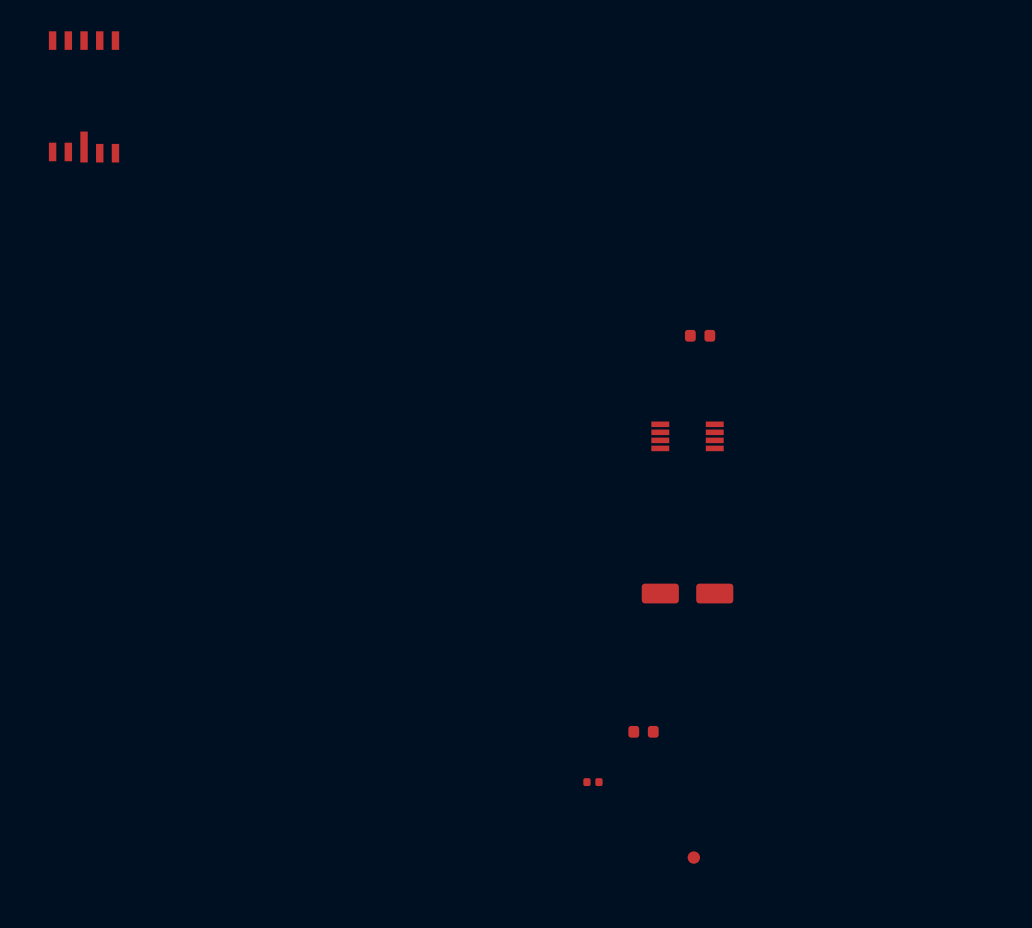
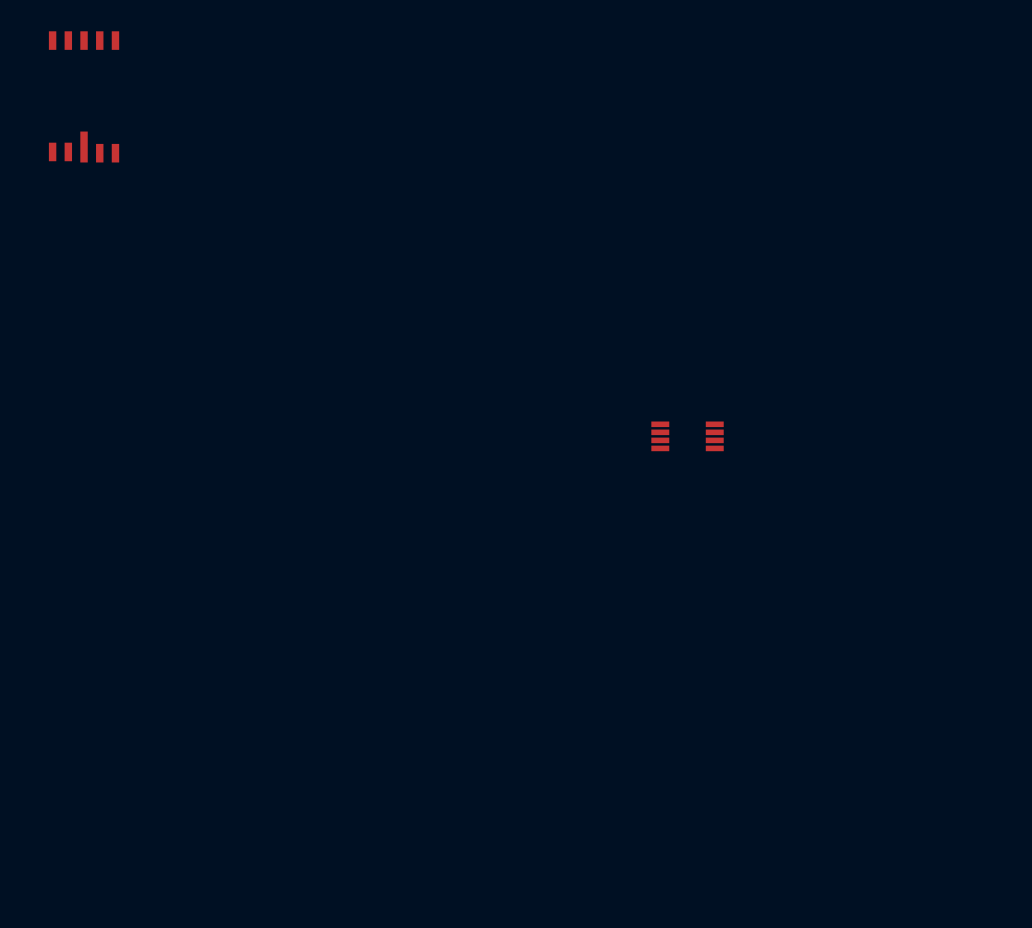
part: (700, 335) -> none
part: (687, 593) -> none
part: (643, 731) -> none
part: (592, 782) -> none
part: (693, 857) -> none

